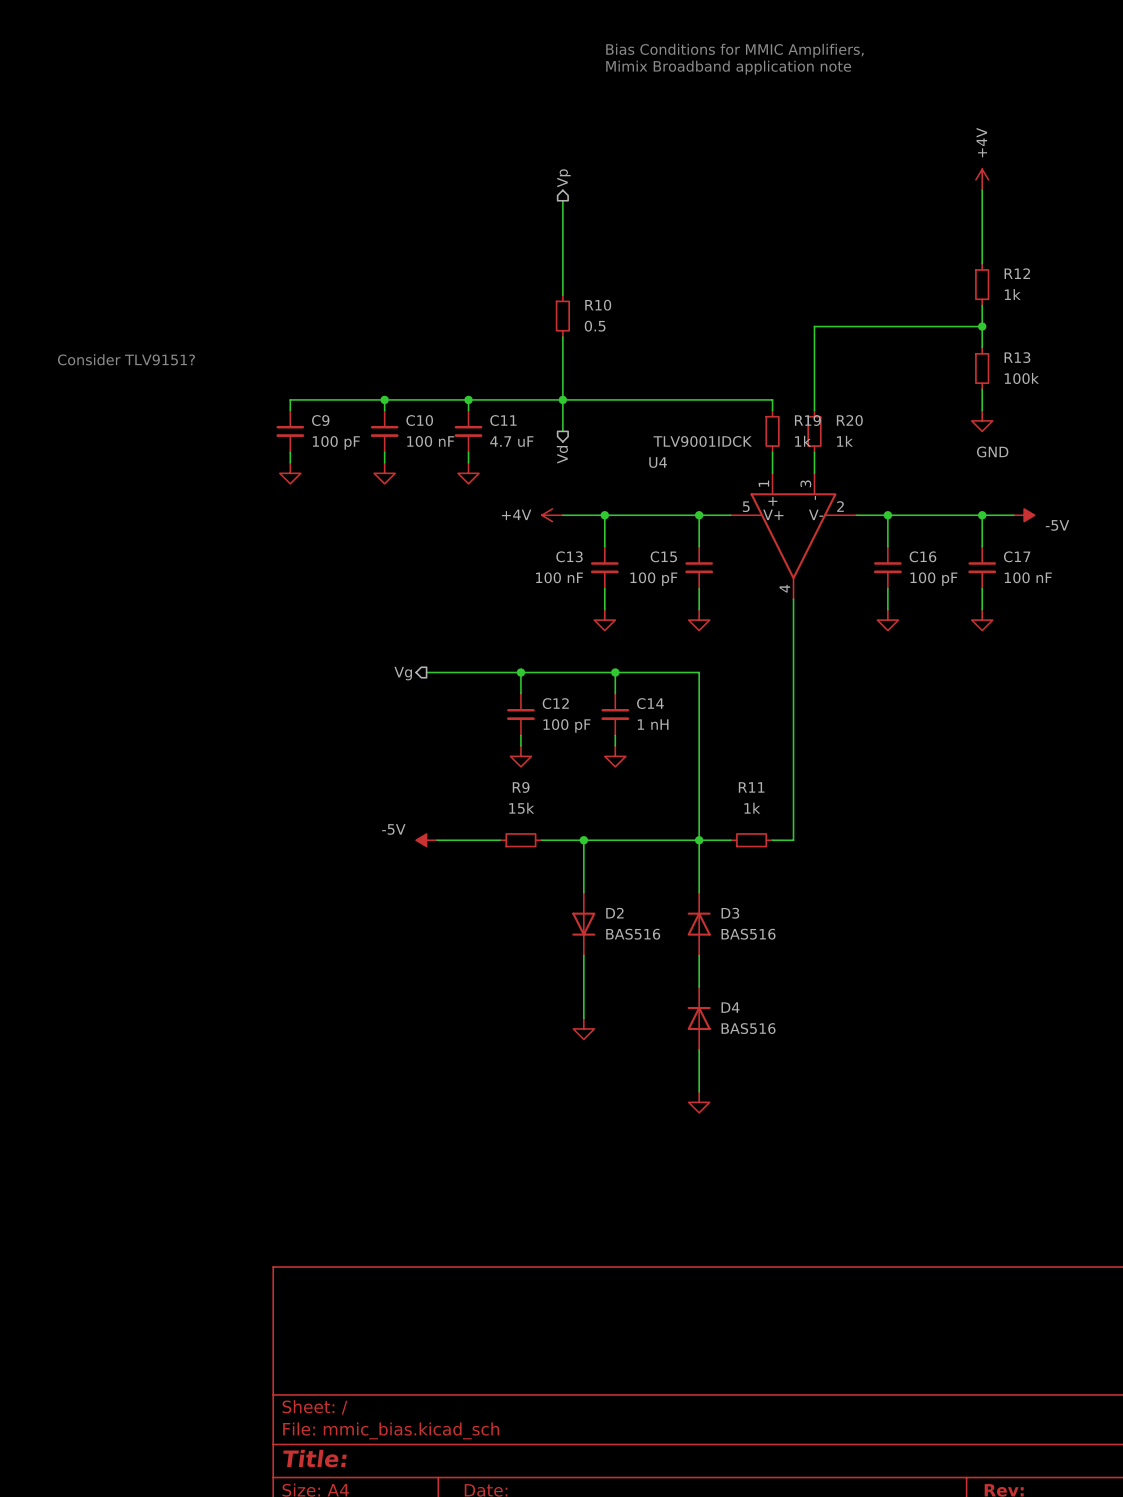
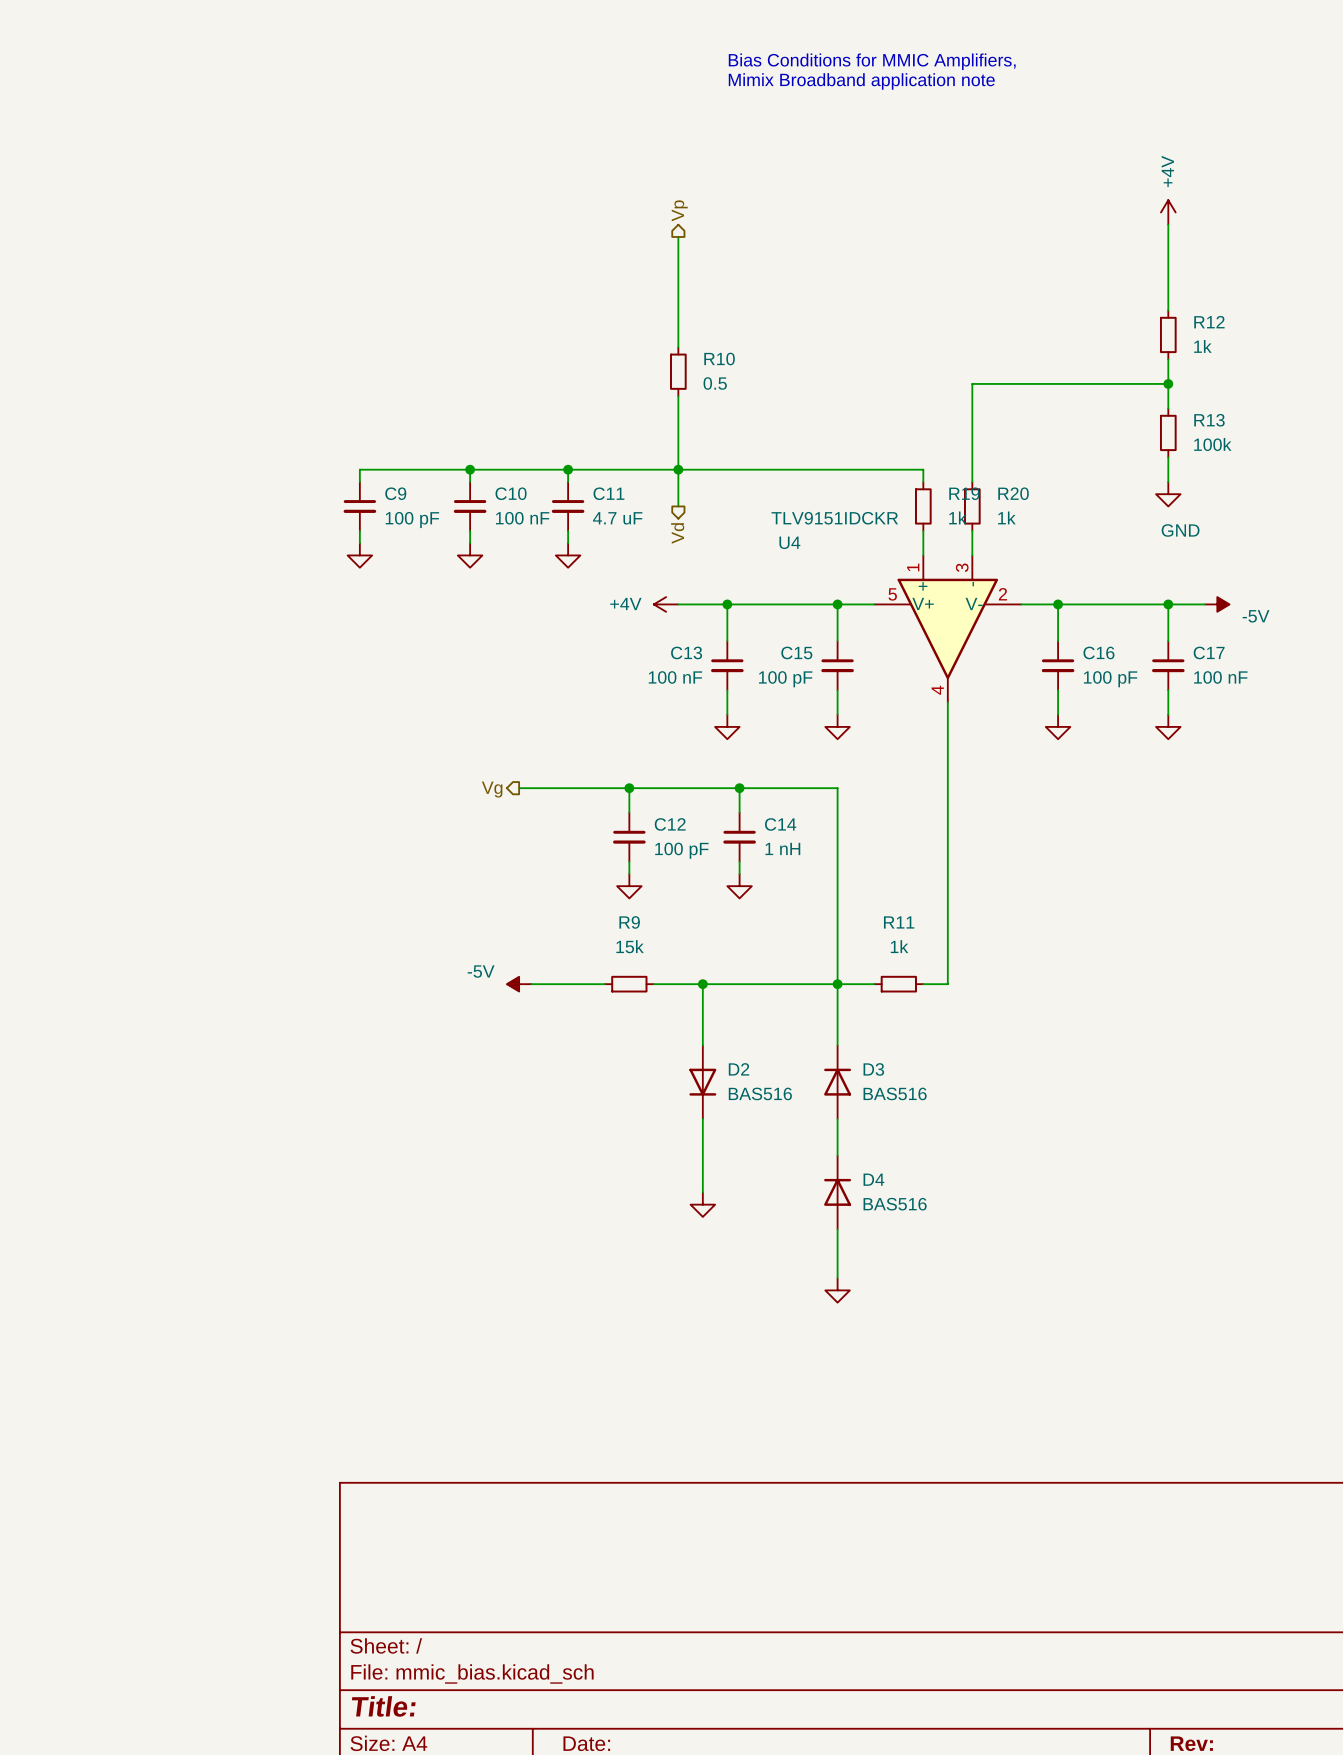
text: Consider TLV9151? (126, 359) -> none
U4 value: TLV9001IDCK (702, 441) -> TLV9151IDCKR (834, 518)

